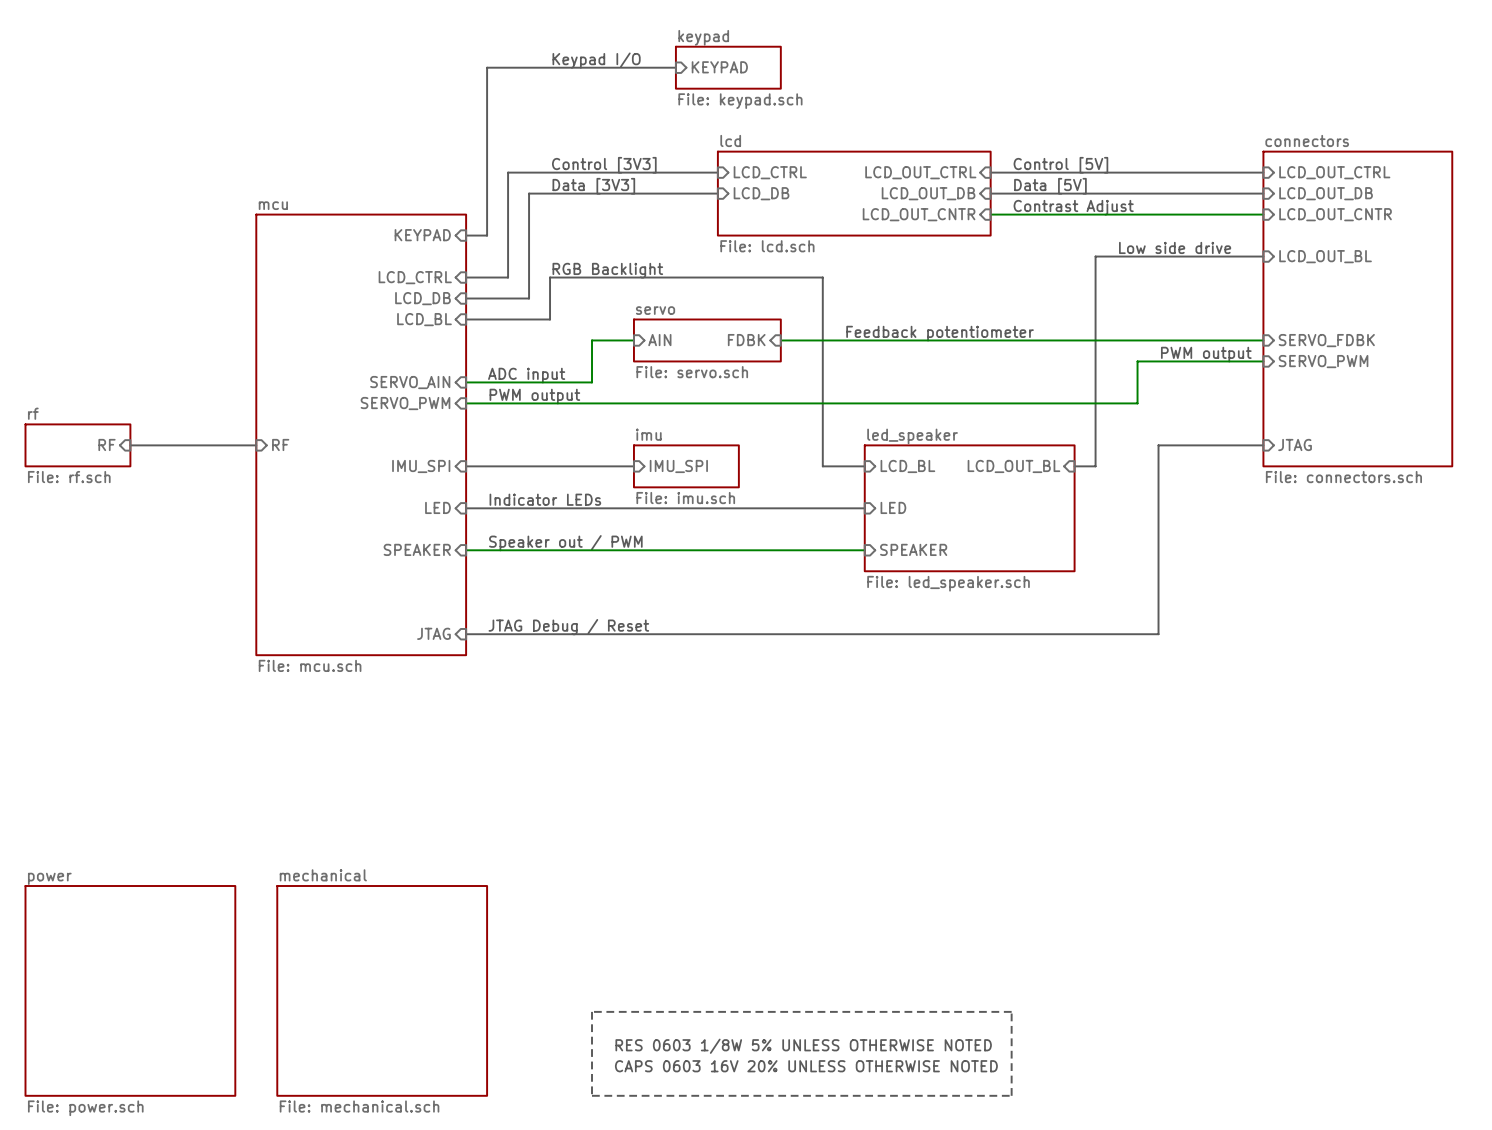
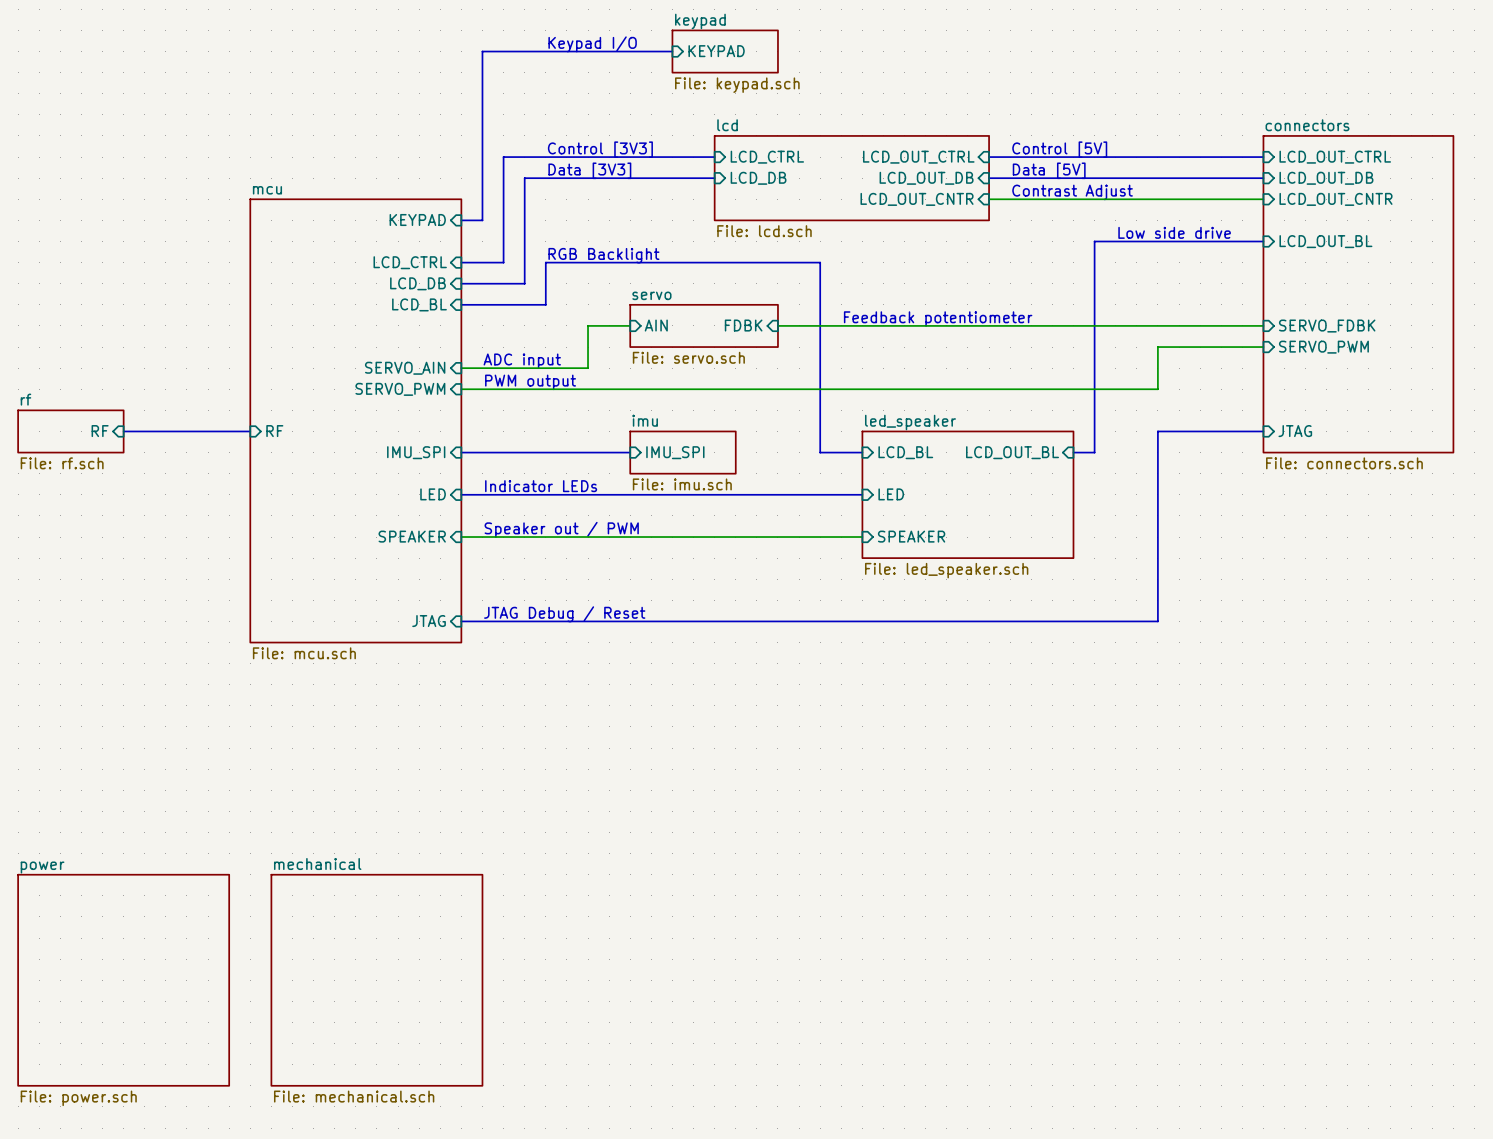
text: PWM output (1206, 354) -> none
wire: (1158, 361) (1137, 361) (1137, 403) -> (1157, 347) (1157, 389) (1136, 389)
line: (592, 1011) (592, 1095) (1011, 1095) (1011, 1011) (592, 1011) -> none
text: RES 0603 1/8W 5% UNLESS OTHERWISE NOTED (803, 1046) -> none
text: CAPS 0603 16V 20% UNLESS OTHERWISE NOTED (806, 1066) -> none

